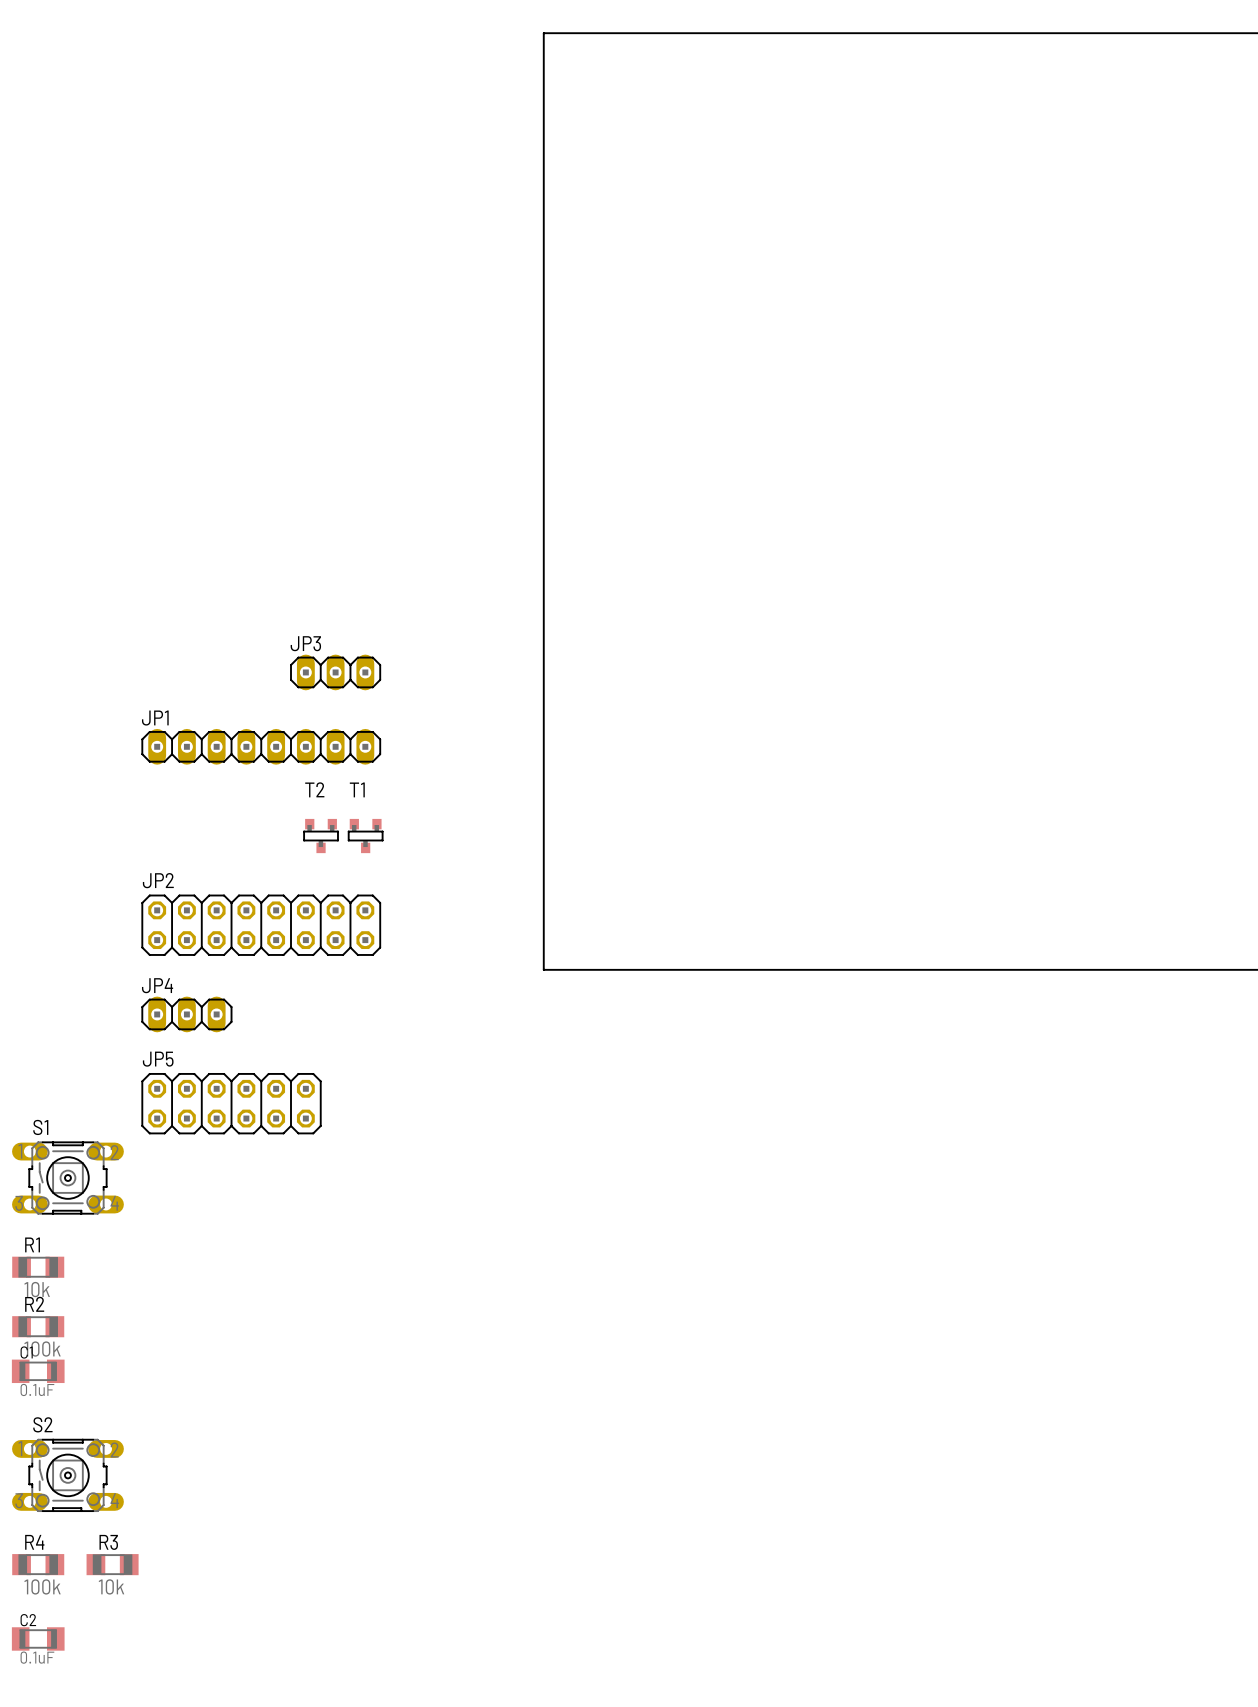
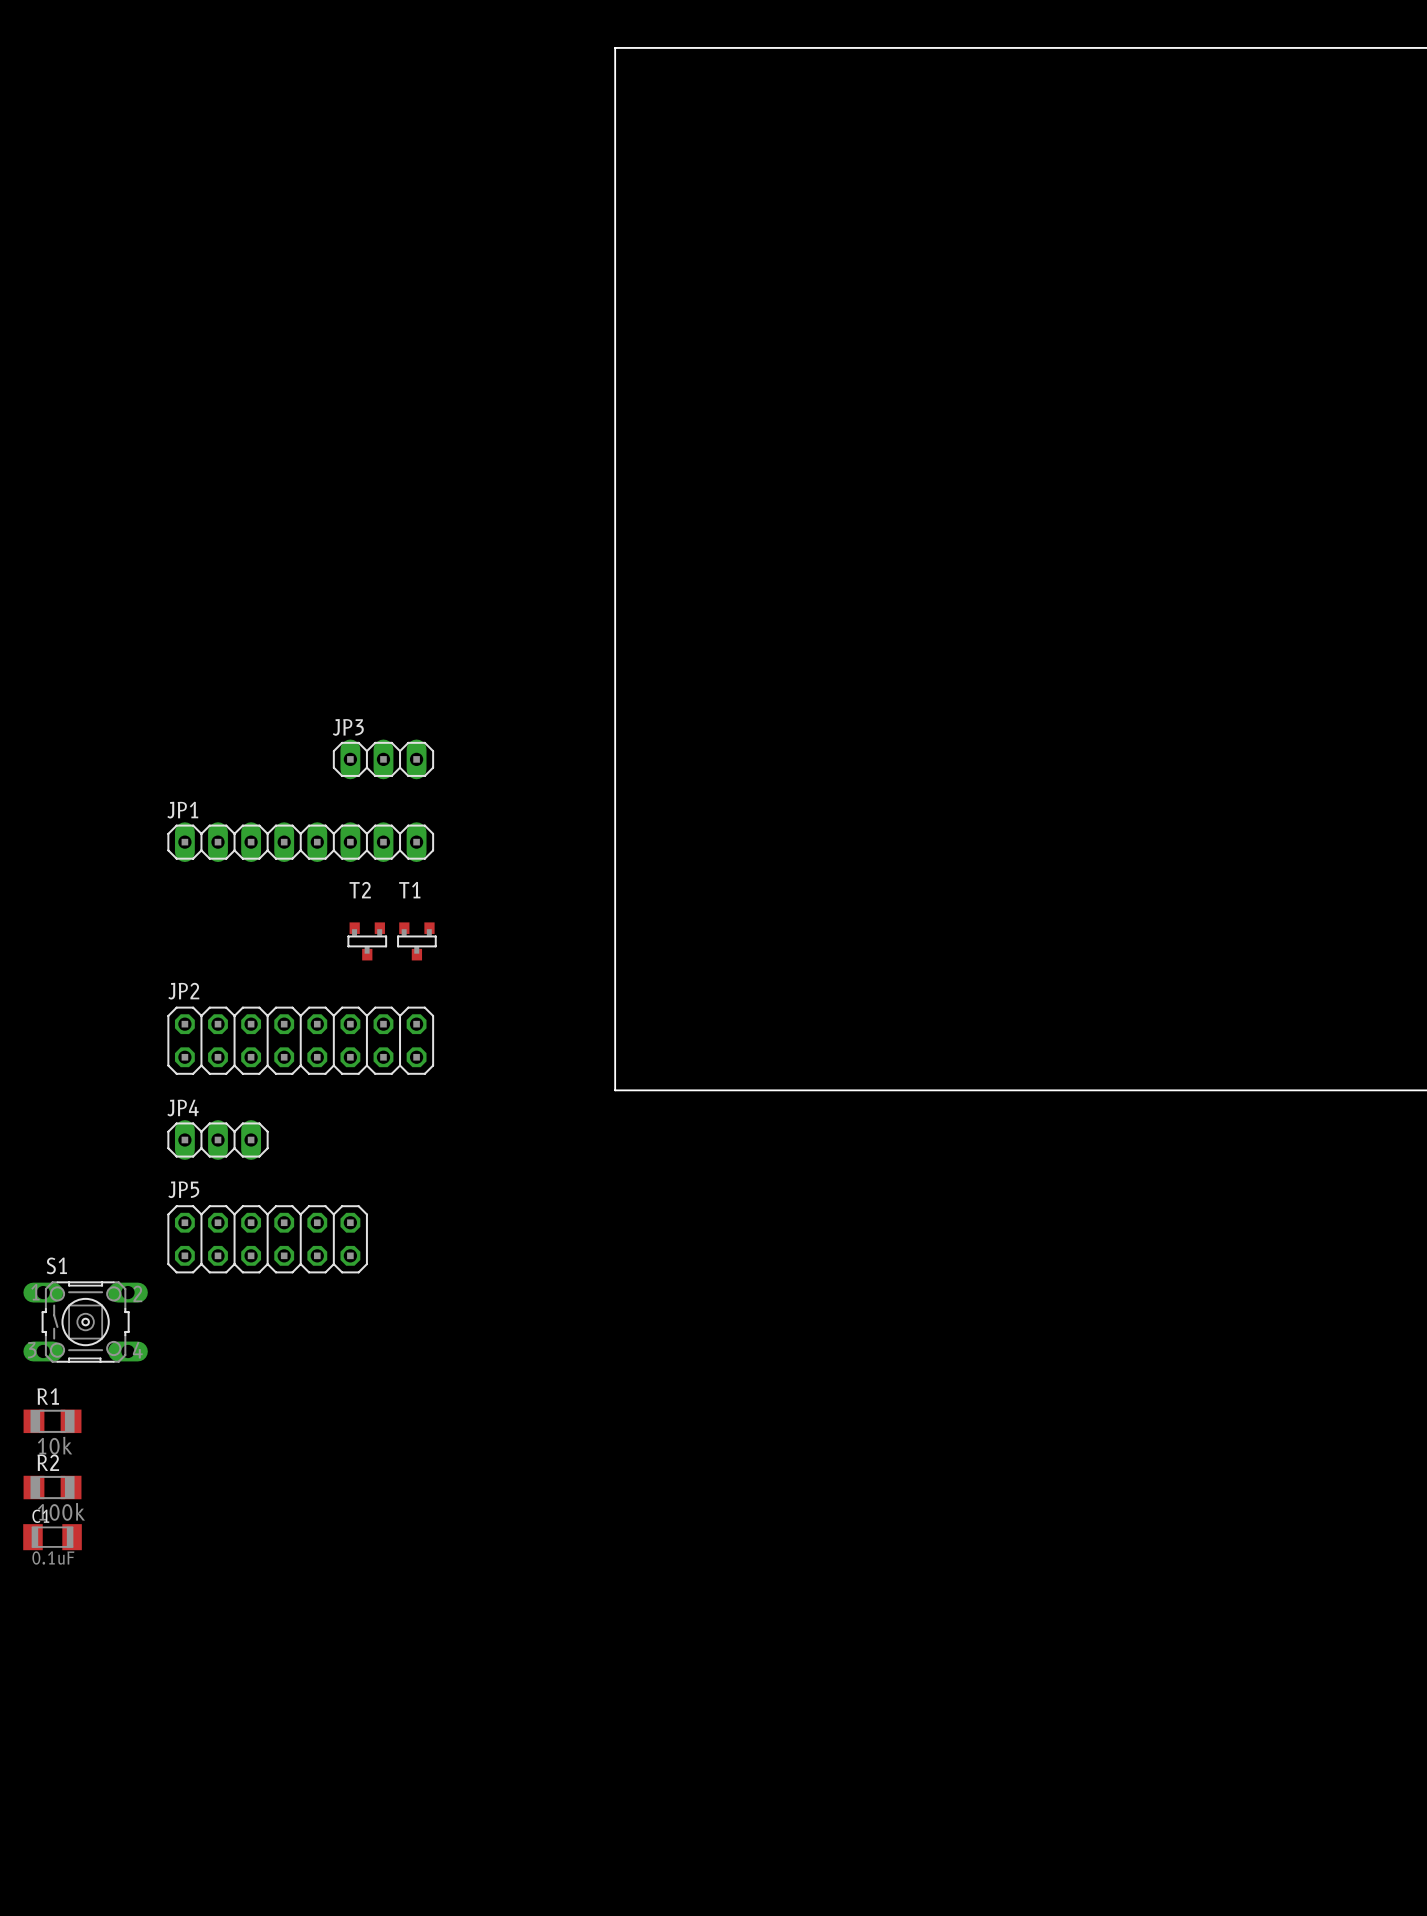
S2: (67, 1475) -> none
R4: 100k (38, 1564) -> none
R3: 10k (112, 1564) -> none
C2: 0.1uF (38, 1638) -> none

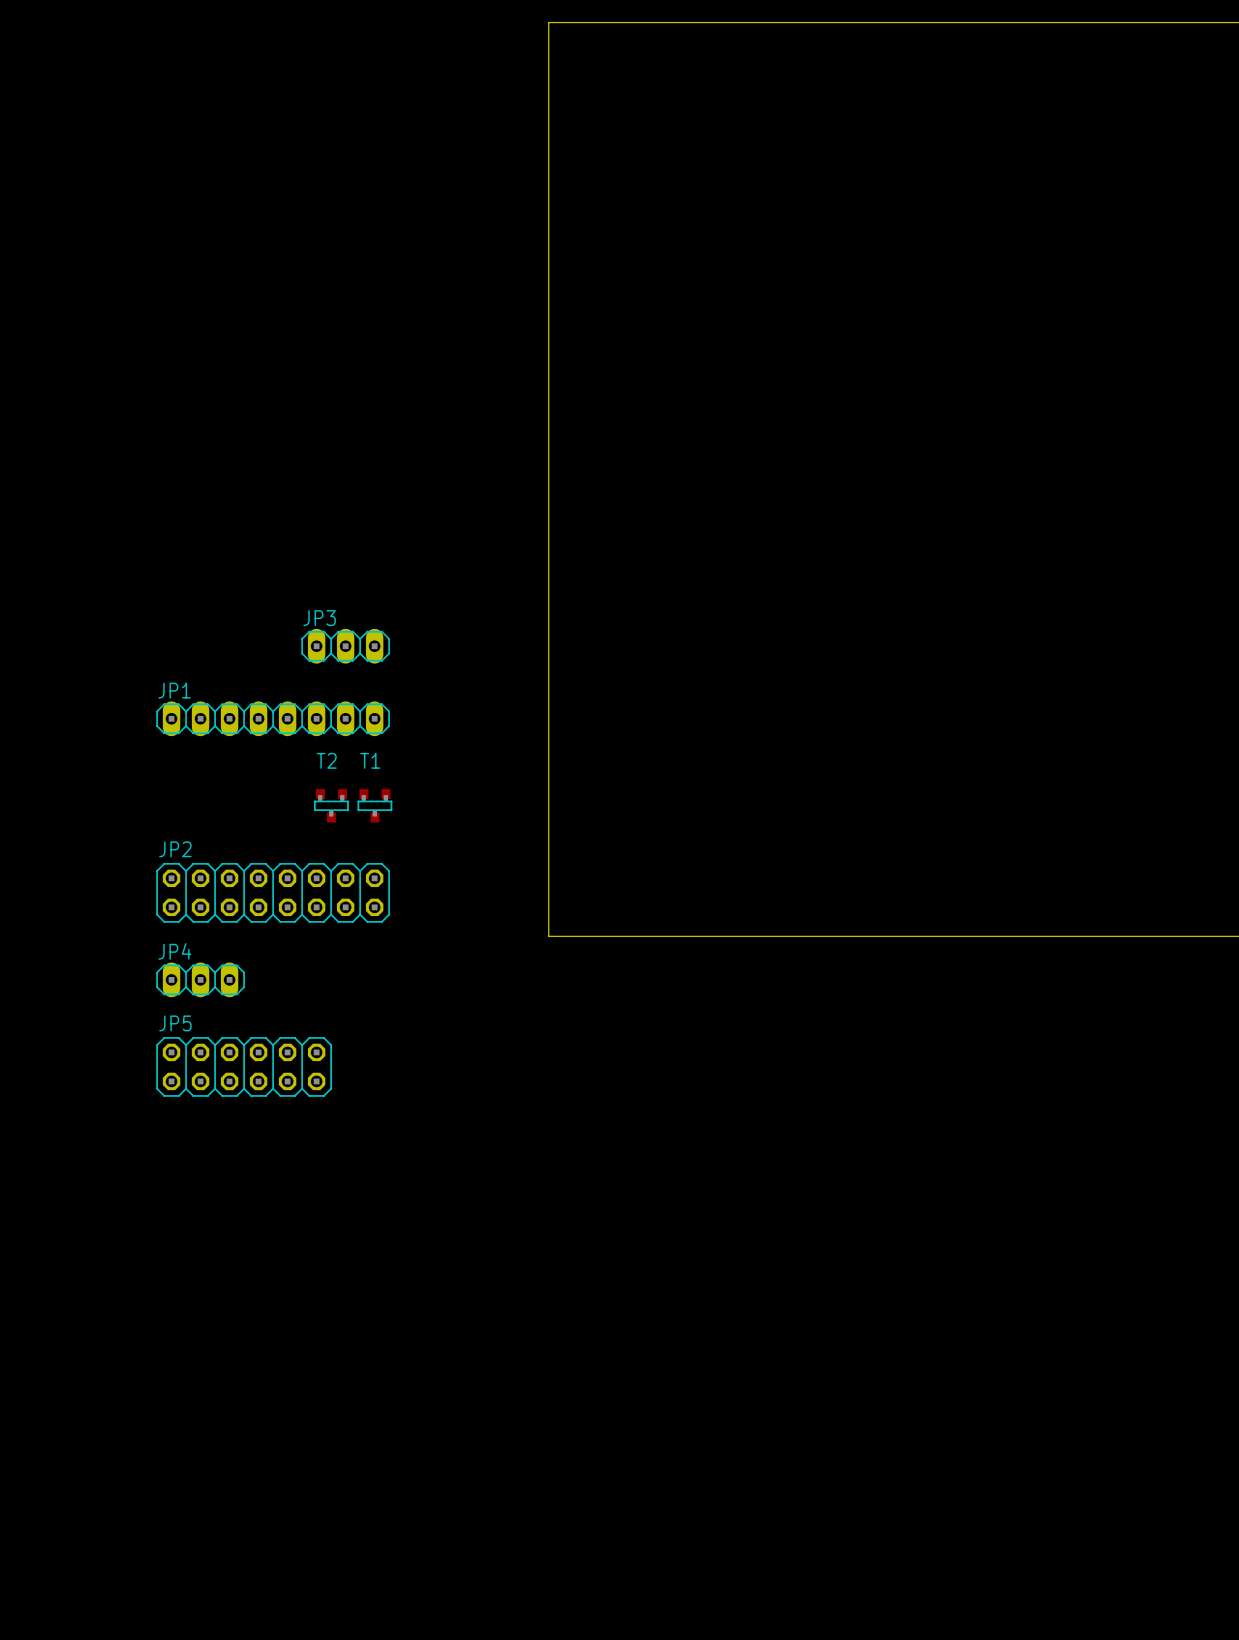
S1: (85, 1322) -> none
R1: 10k (52, 1421) -> none
R2: 100k (52, 1487) -> none
C1: 0.1uF (52, 1537) -> none

